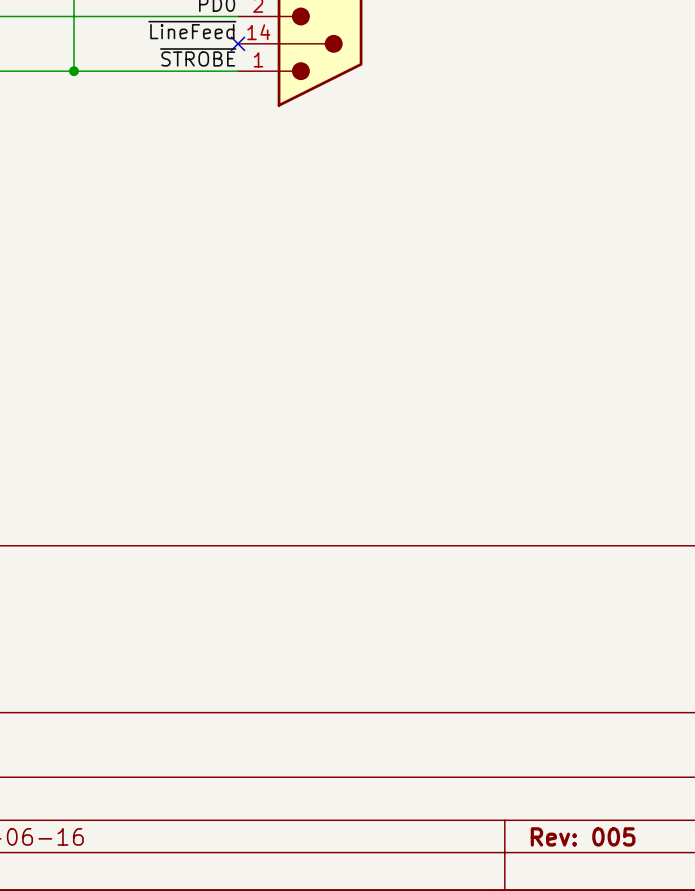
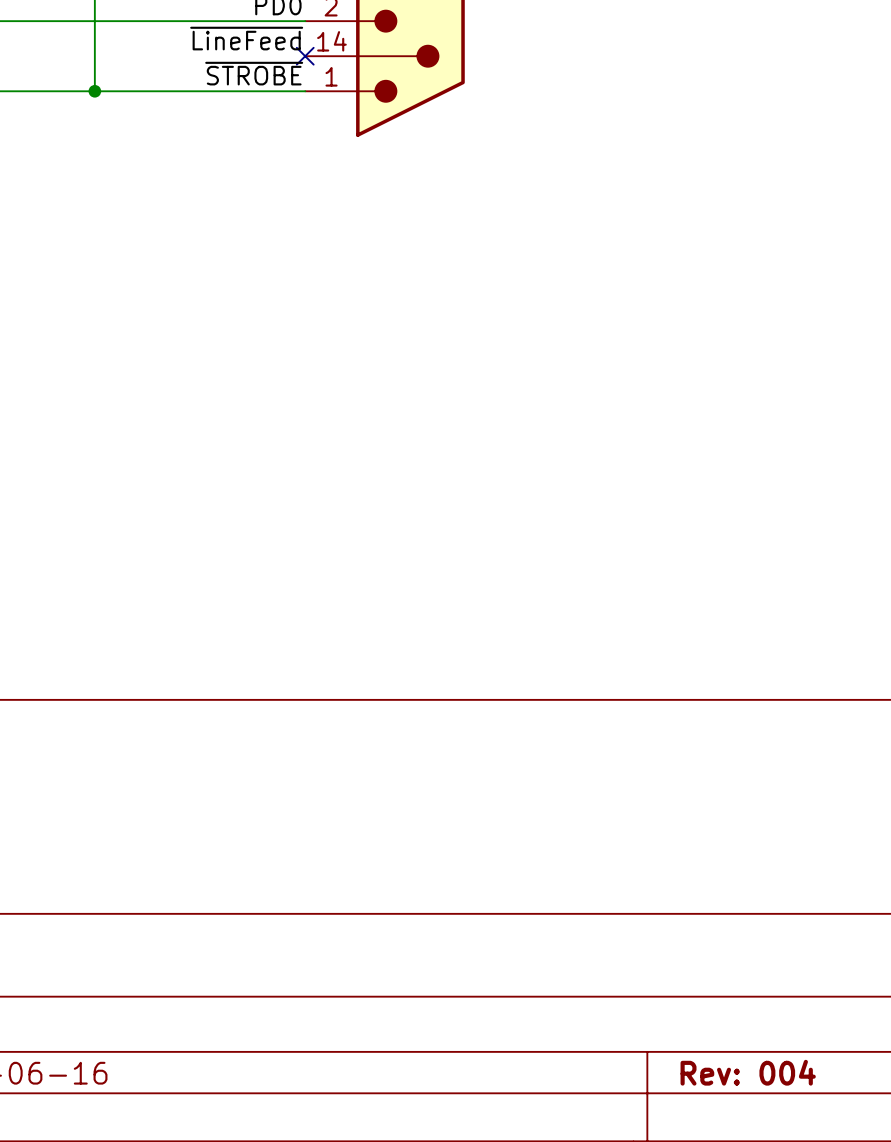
title block: Rev: 005 (583, 836) -> Rev: 004 (748, 1072)

